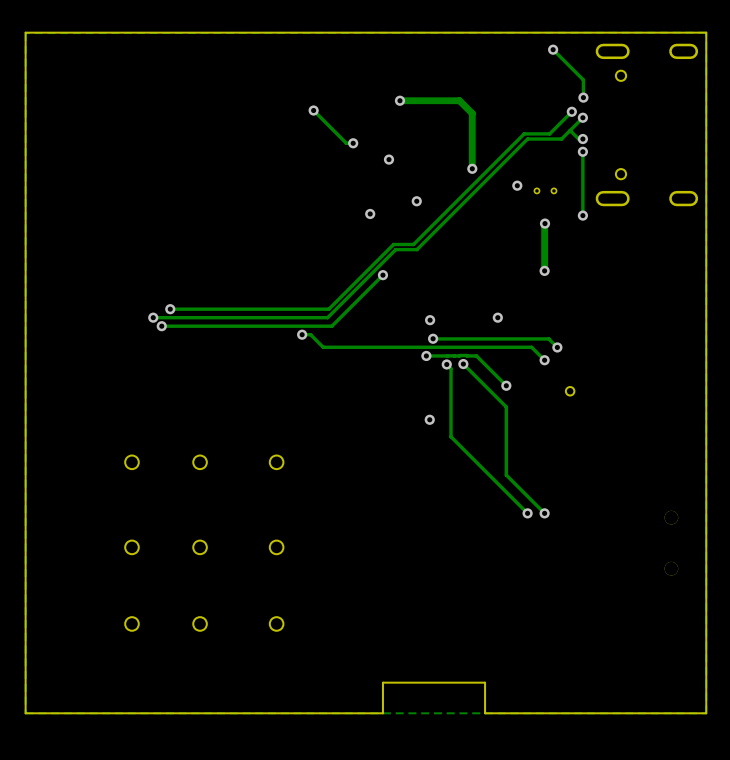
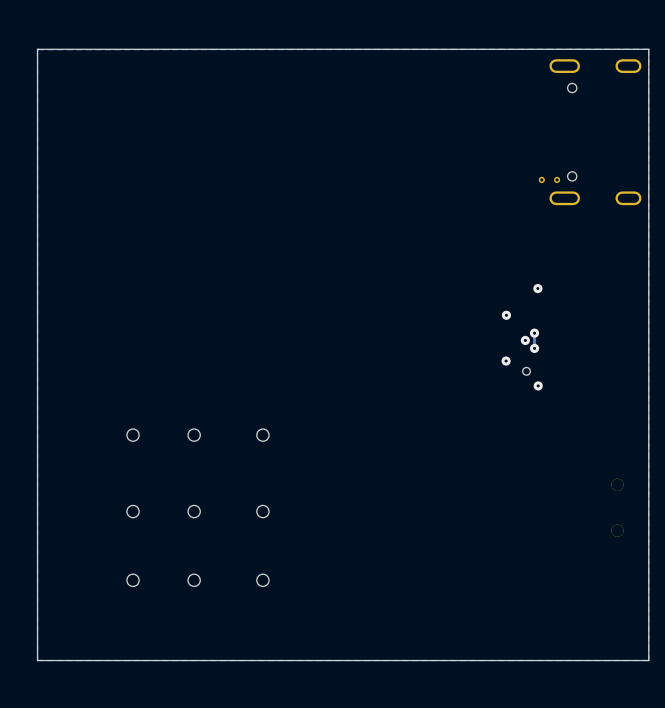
track: (553, 49) (583, 79) (583, 97) -> none
via: (553, 49) -> none
via: (583, 97) -> none
track: (399, 100) (459, 100) (472, 113) (472, 168) -> none
via: (399, 100) -> none
track: (313, 110) (346, 143) (353, 143) -> none
via: (313, 110) -> none
track: (571, 111) (549, 133) (524, 133) (413, 244) (393, 244) (328, 309) (170, 309) -> none
via: (571, 111) -> none
track: (582, 117) (561, 139) (527, 139) (416, 249) (395, 249) (327, 317) (153, 317) -> none
via: (582, 117) -> none
track: (570, 130) (578, 139) (582, 139) -> none
via: (582, 139) -> none
via: (353, 143) -> none
track: (582, 151) (582, 215) -> none
via: (582, 151) -> none
via: (389, 159) -> none
via: (472, 168) -> none
via: (517, 185) -> none
part position: (545, 190) -> (549, 179)
via: (416, 201) -> none
via: (370, 213) -> none
via: (582, 215) -> none
track: (545, 223) (544, 270) -> none
via: (545, 223) -> none
via: (544, 270) -> none
track: (382, 275) (331, 326) (161, 326) -> none
via: (382, 275) -> none
via: none -> (537, 288)
via: (170, 309) -> none
via: (153, 317) -> none
via: (497, 317) -> none
via: (430, 320) -> none
via: (161, 326) -> none
via: none -> (506, 315)
track: (302, 334) (310, 334) (323, 347) (531, 347) (544, 360) -> none
via: (302, 334) -> none
track: (433, 338) (548, 338) (557, 347) -> none
via: (433, 338) -> none
via: (557, 347) -> none
track: none -> (534, 333) (534, 348)
via: none -> (534, 333)
track: (426, 355) (476, 355) (506, 385) -> none
via: (426, 355) -> none
via: none -> (525, 340)
via: (544, 360) -> none
track: (446, 364) (451, 368) (451, 436) (527, 513) -> none
via: (446, 364) -> none
track: (463, 364) (506, 407) (506, 475) (544, 513) -> none
via: (463, 364) -> none
via: none -> (534, 348)
via: none -> (506, 361)
via: (506, 385) -> none
via: none -> (538, 385)
via: (429, 419) -> none
via: (527, 513) -> none
via: (544, 513) -> none
board edge: (485, 713) (485, 682) (382, 682) (382, 713) -> (450, 660) (358, 660)

